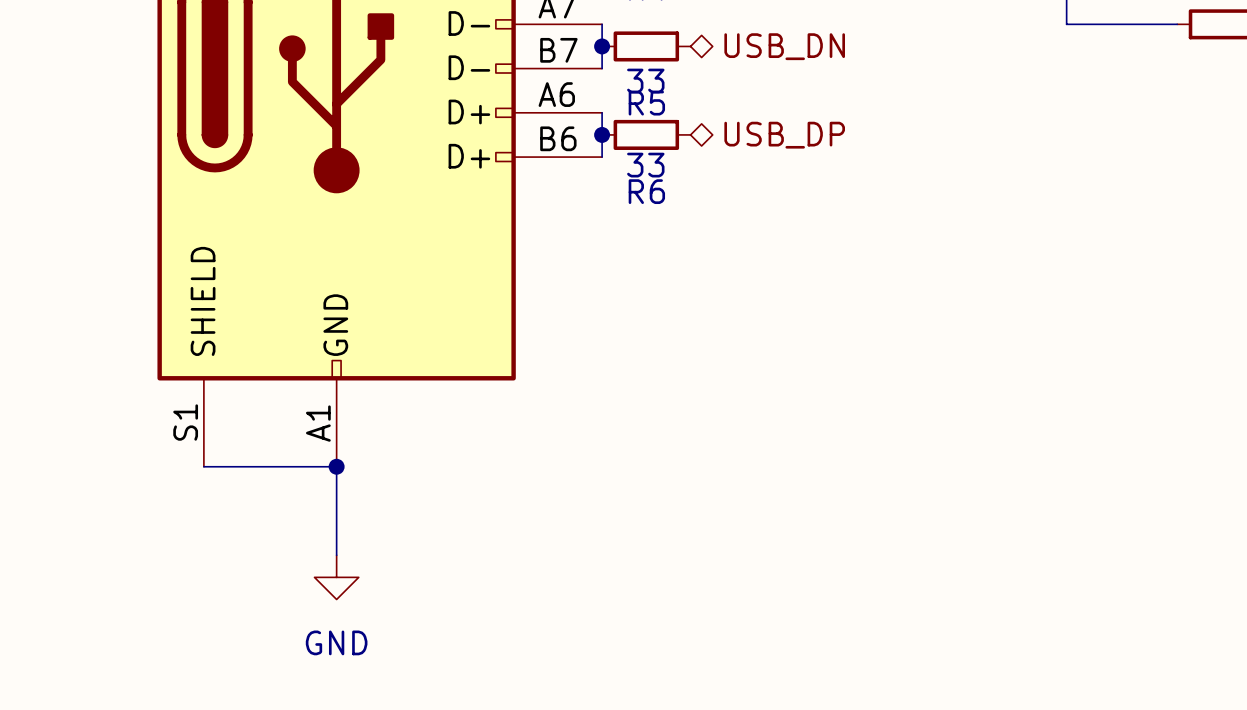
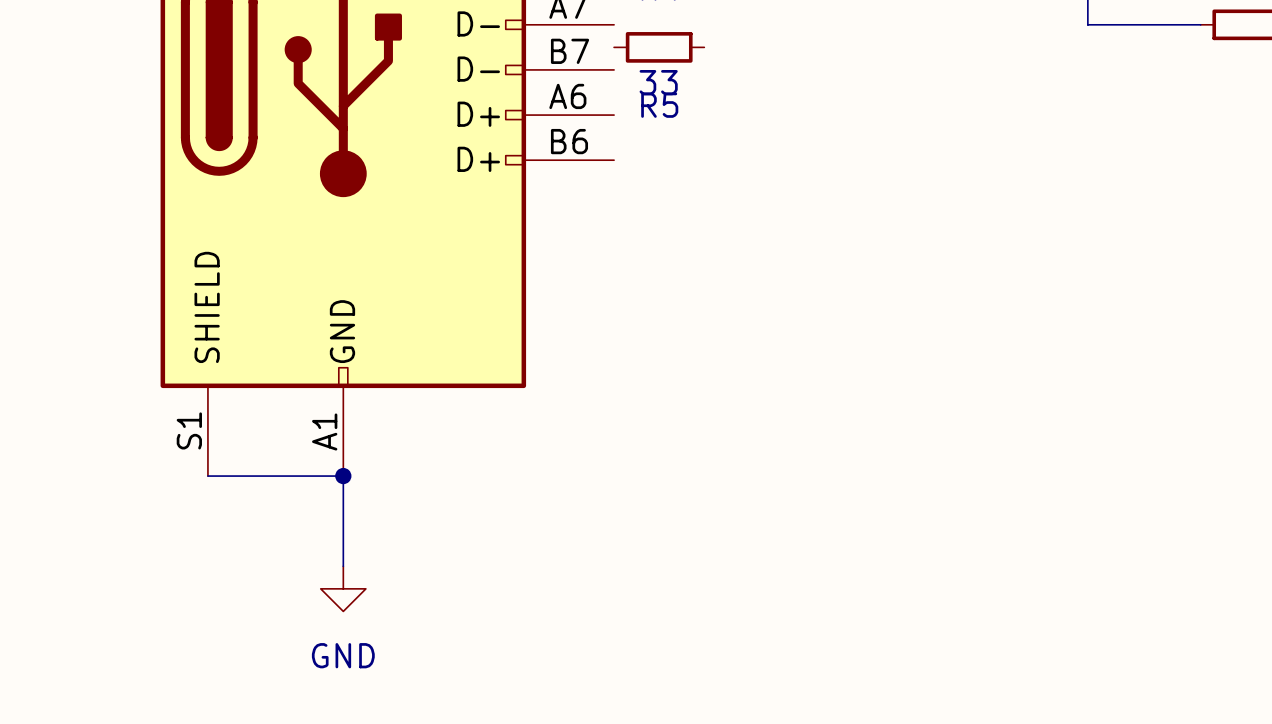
wire: (602, 24) (602, 68) -> none
junction: (602, 46) -> none
hierarchical label: USB_DN (784, 46) -> none
wire: (602, 112) (602, 157) -> none
junction: (602, 134) -> none
R6: 33 (646, 134) -> none
hierarchical label: USB_DP (784, 135) -> none

